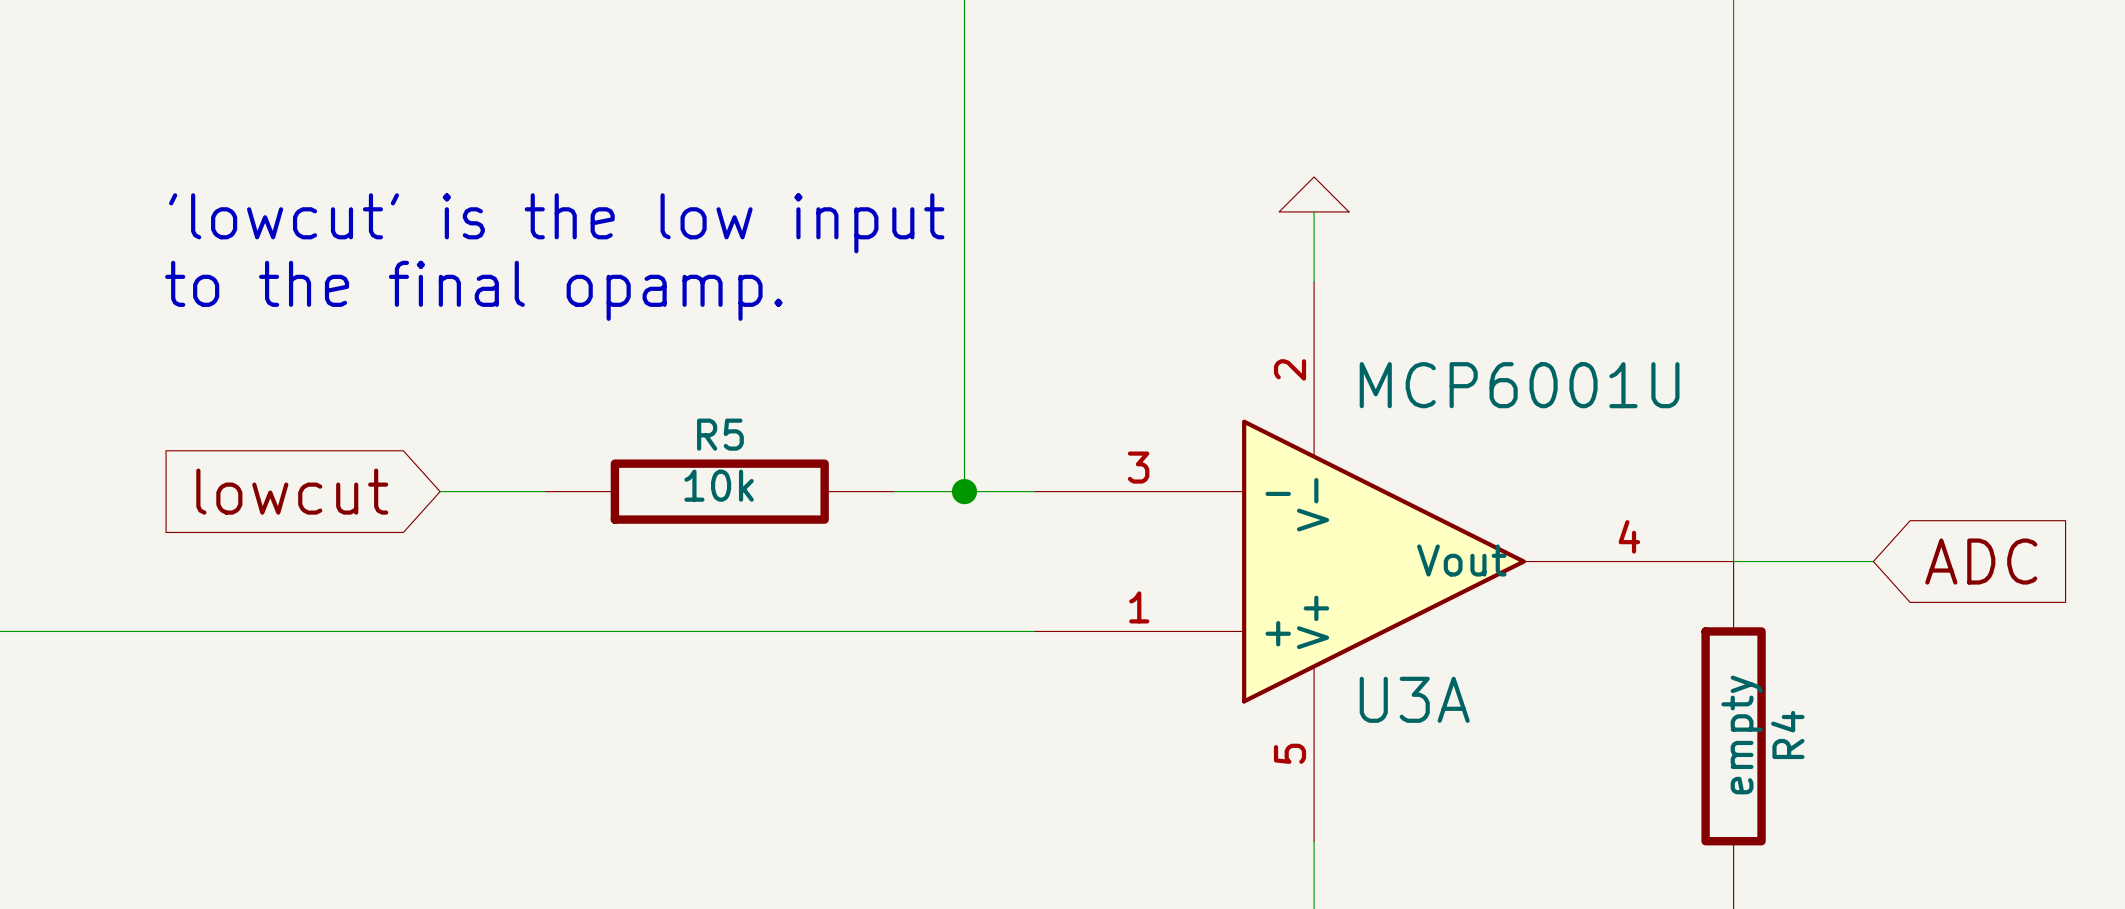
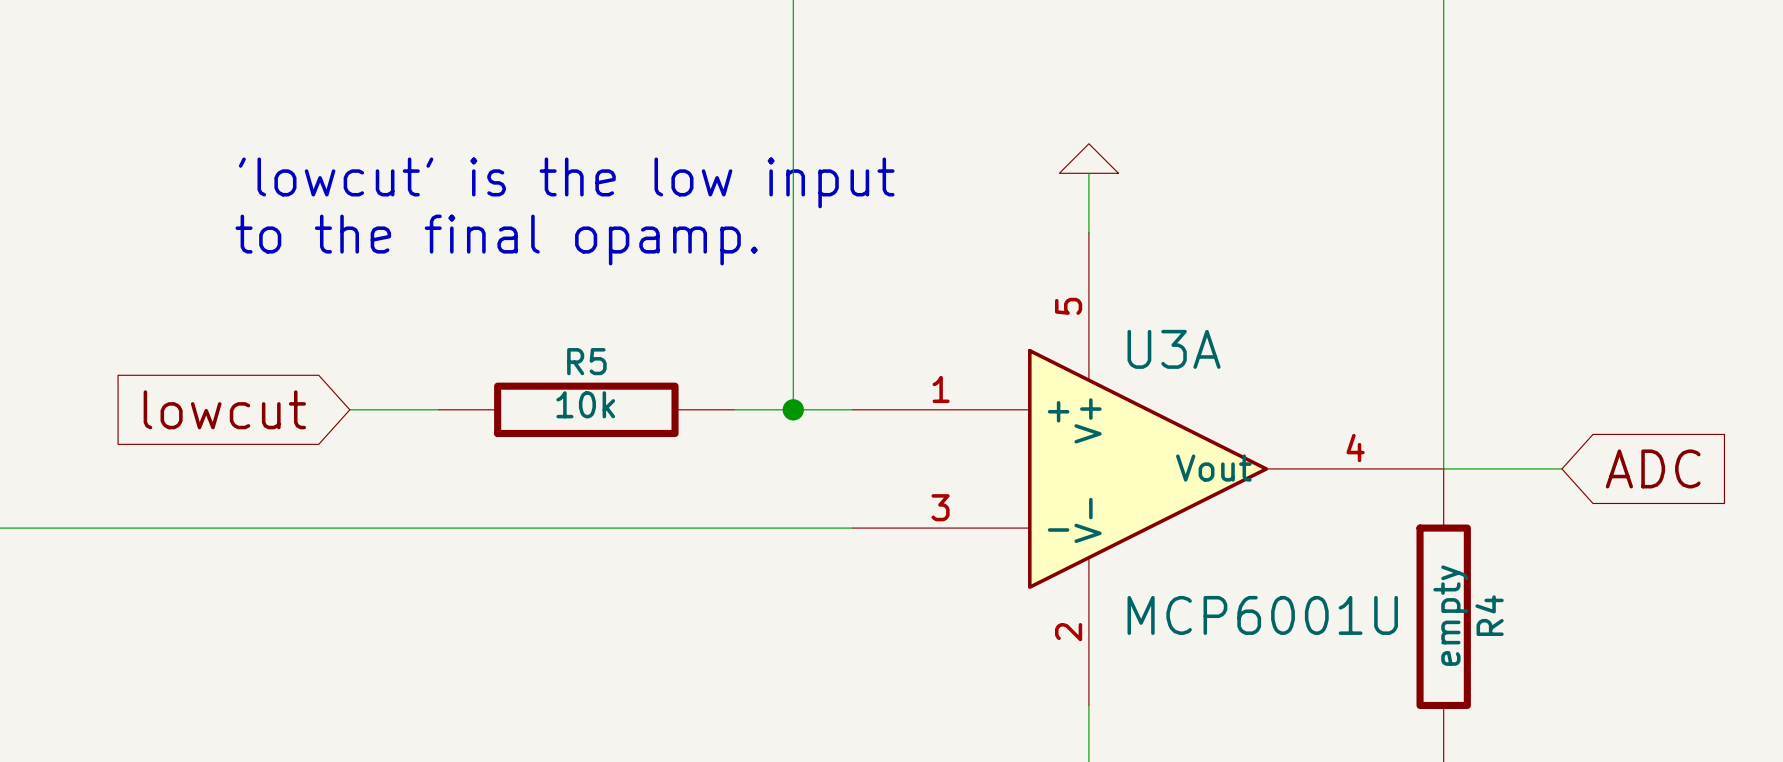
text position: 'lowcut' is the low input (556, 223) -> 'lowcut' is the low input (566, 182)
text position: to the final opamp. (473, 290) -> to the final opamp. (496, 240)
U3A flip: as is (1383, 561) -> up-down (1148, 468)

